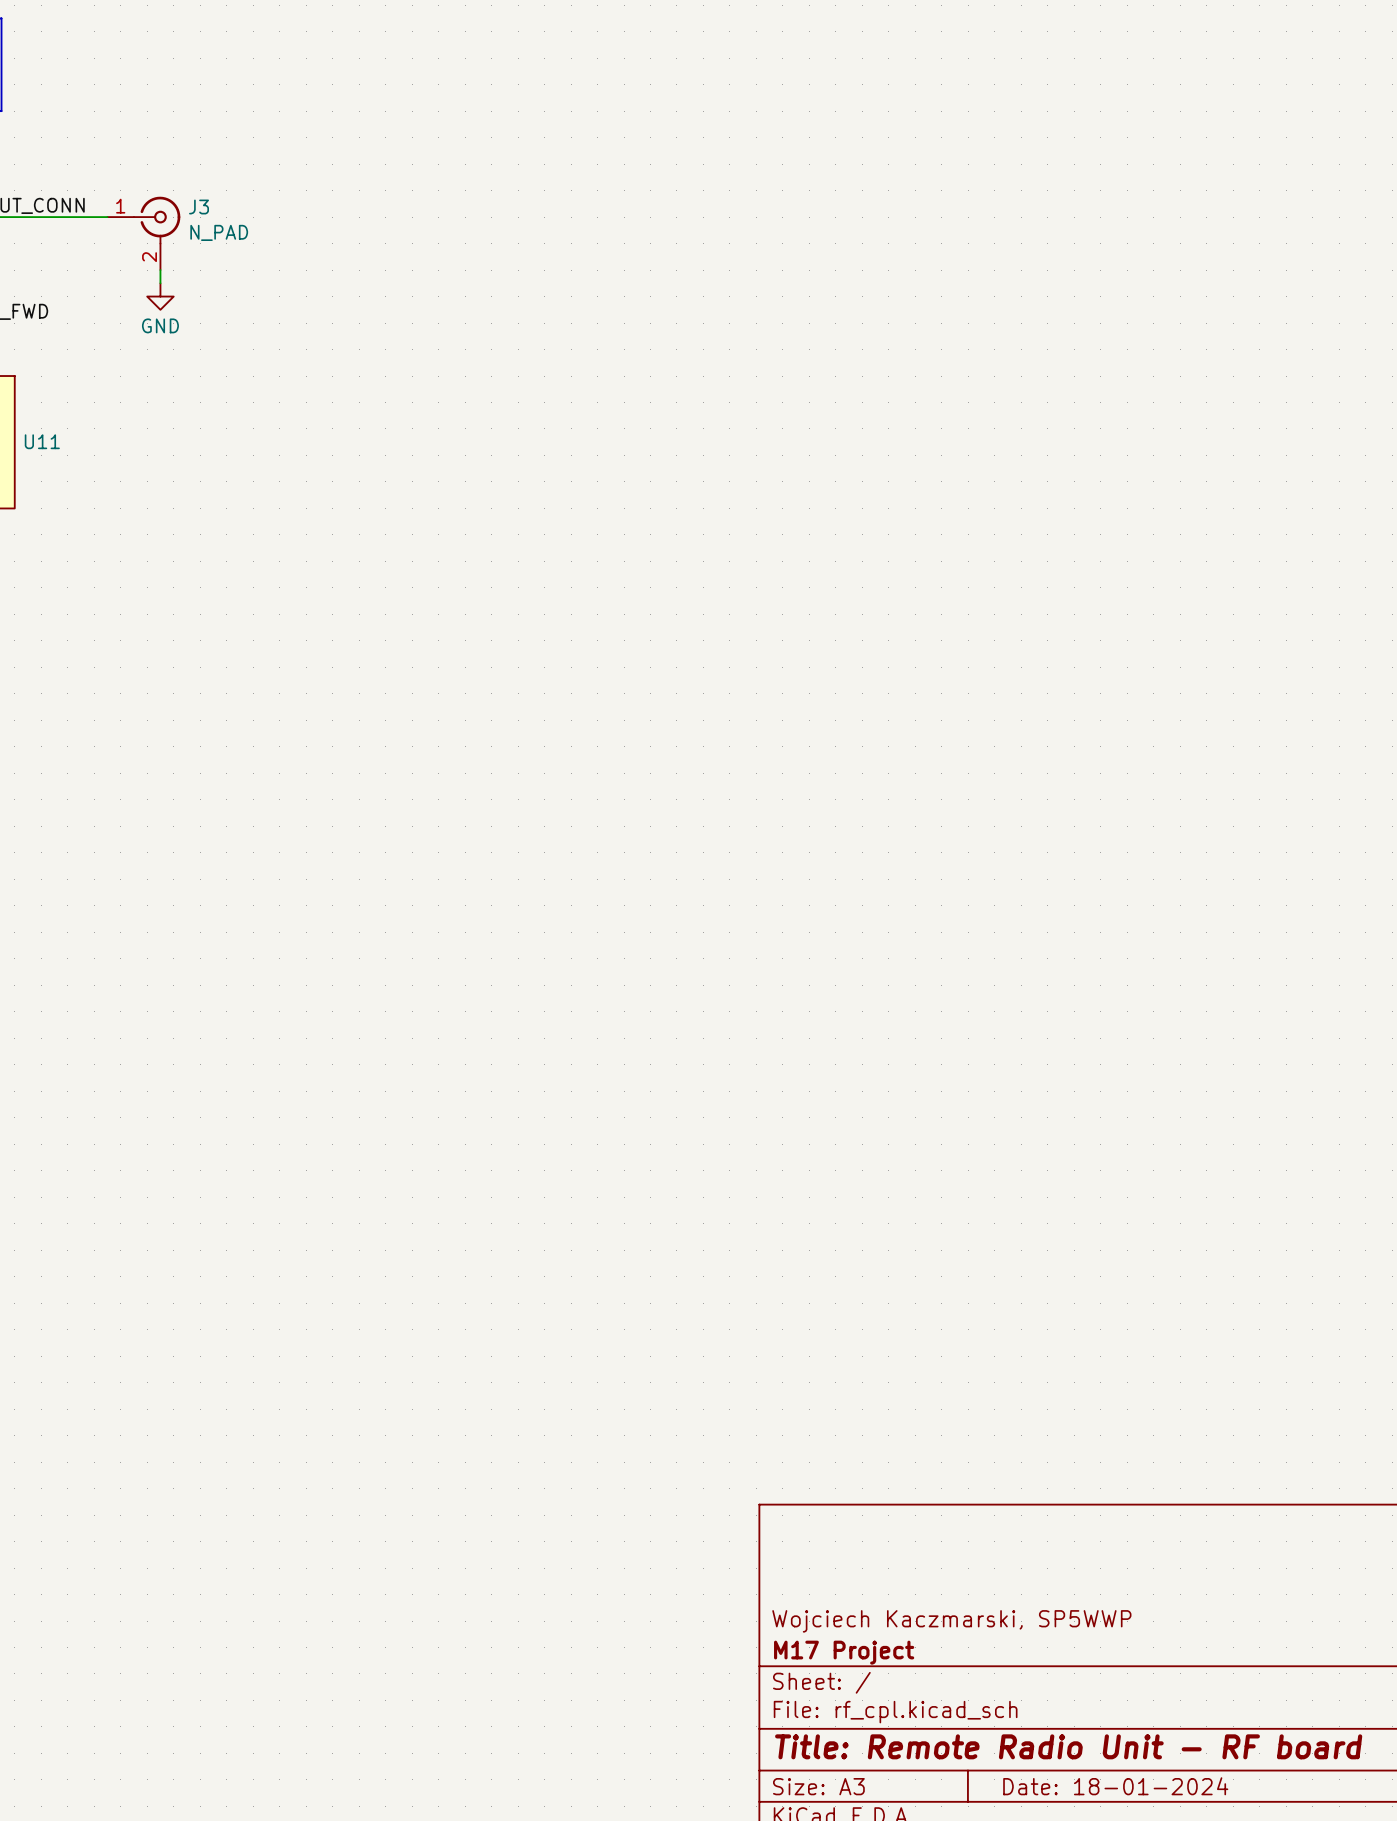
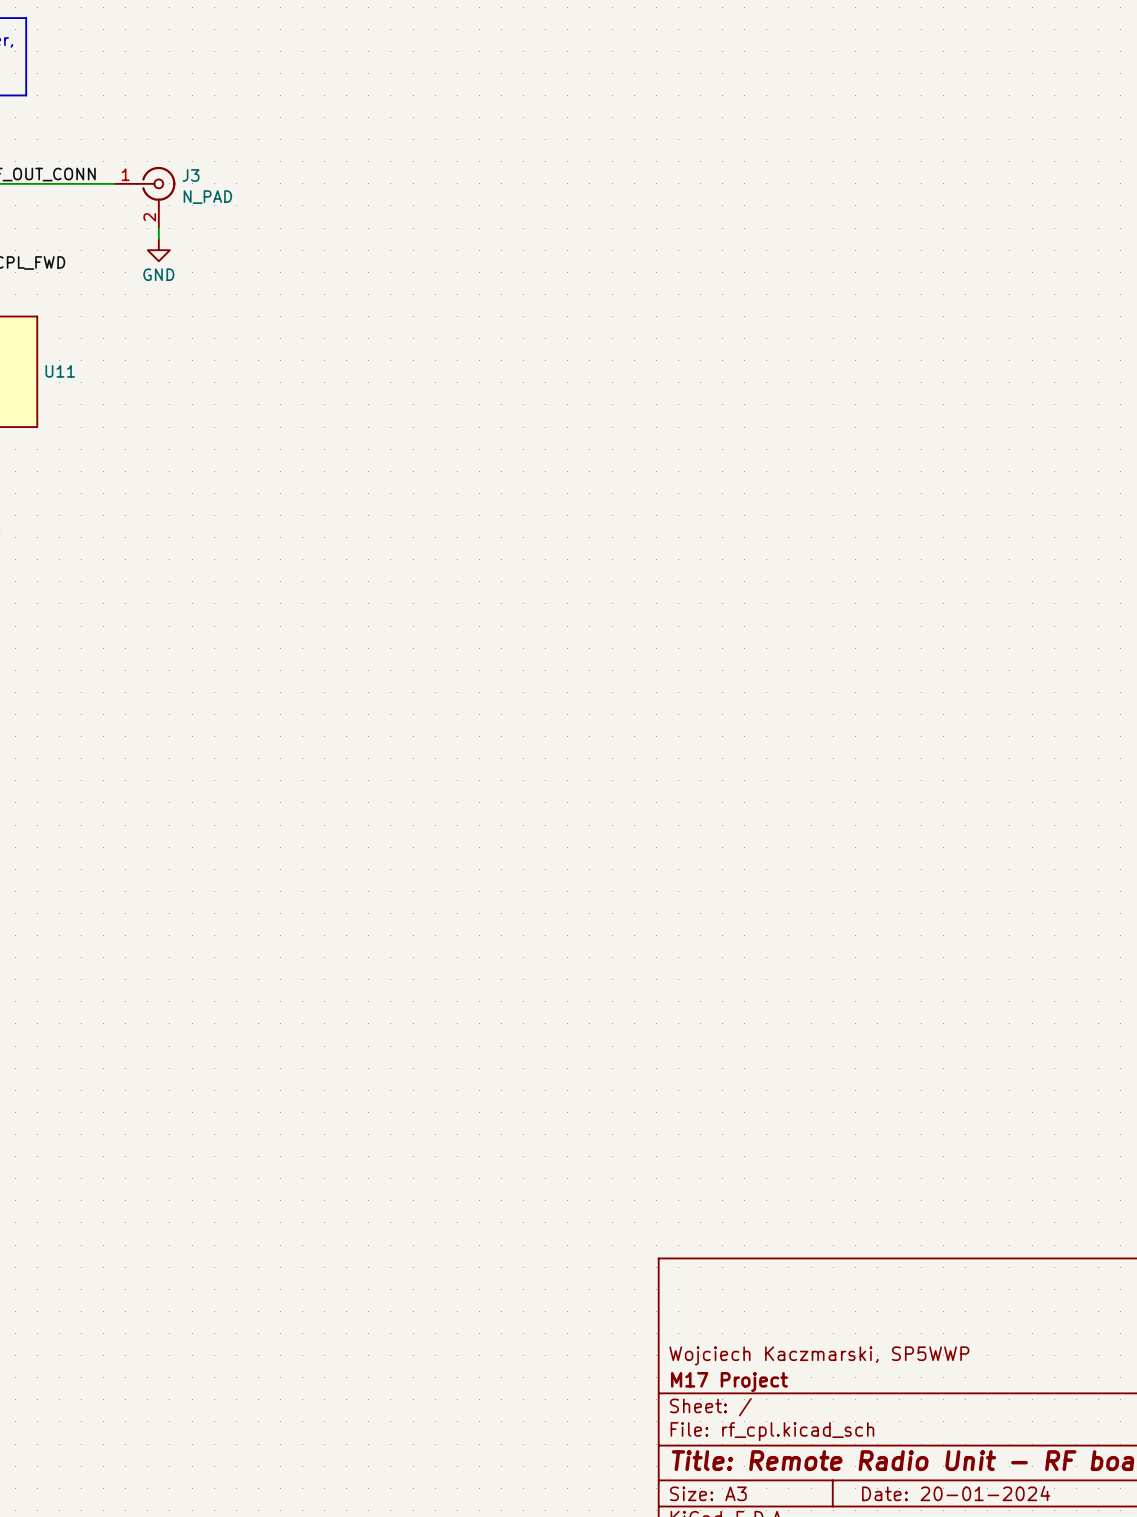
title block: Date: 18-01-2024 (1115, 1786) -> Date: 20-01-2024 (956, 1493)

